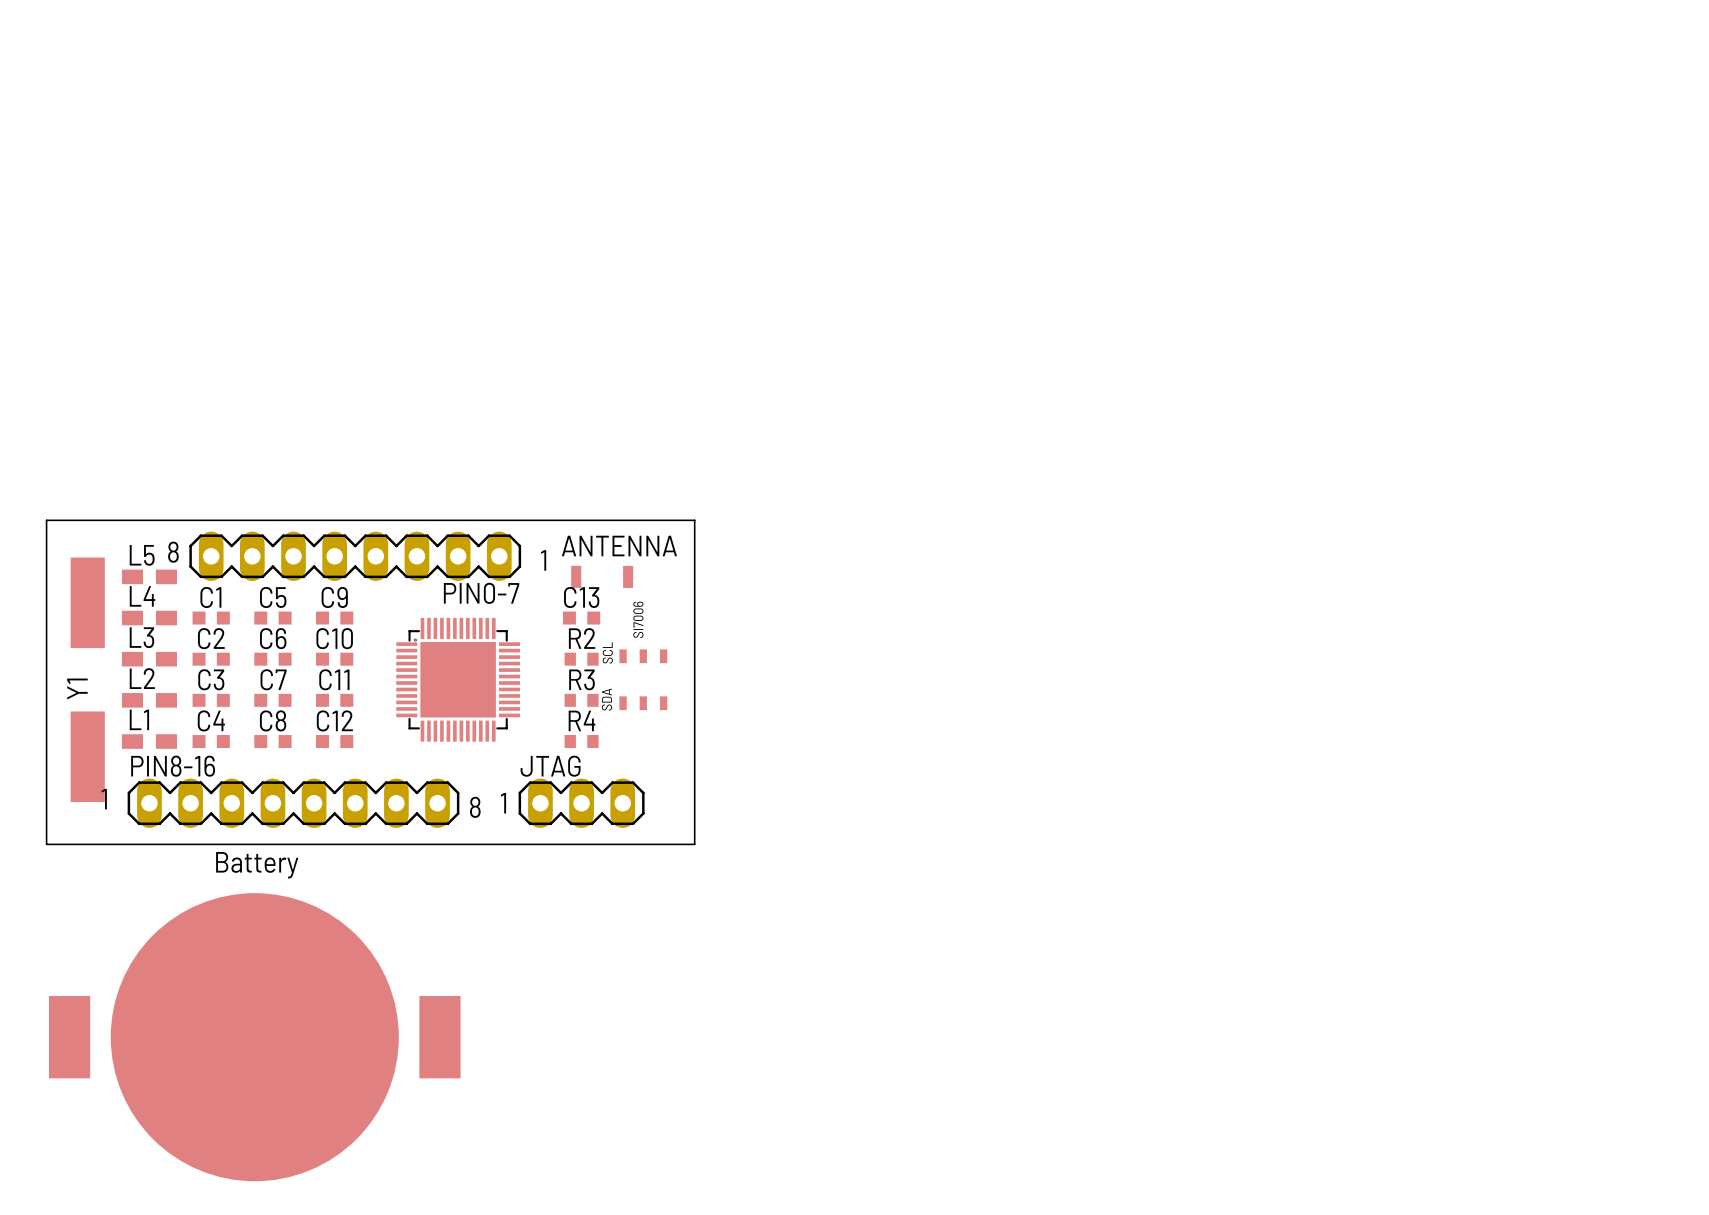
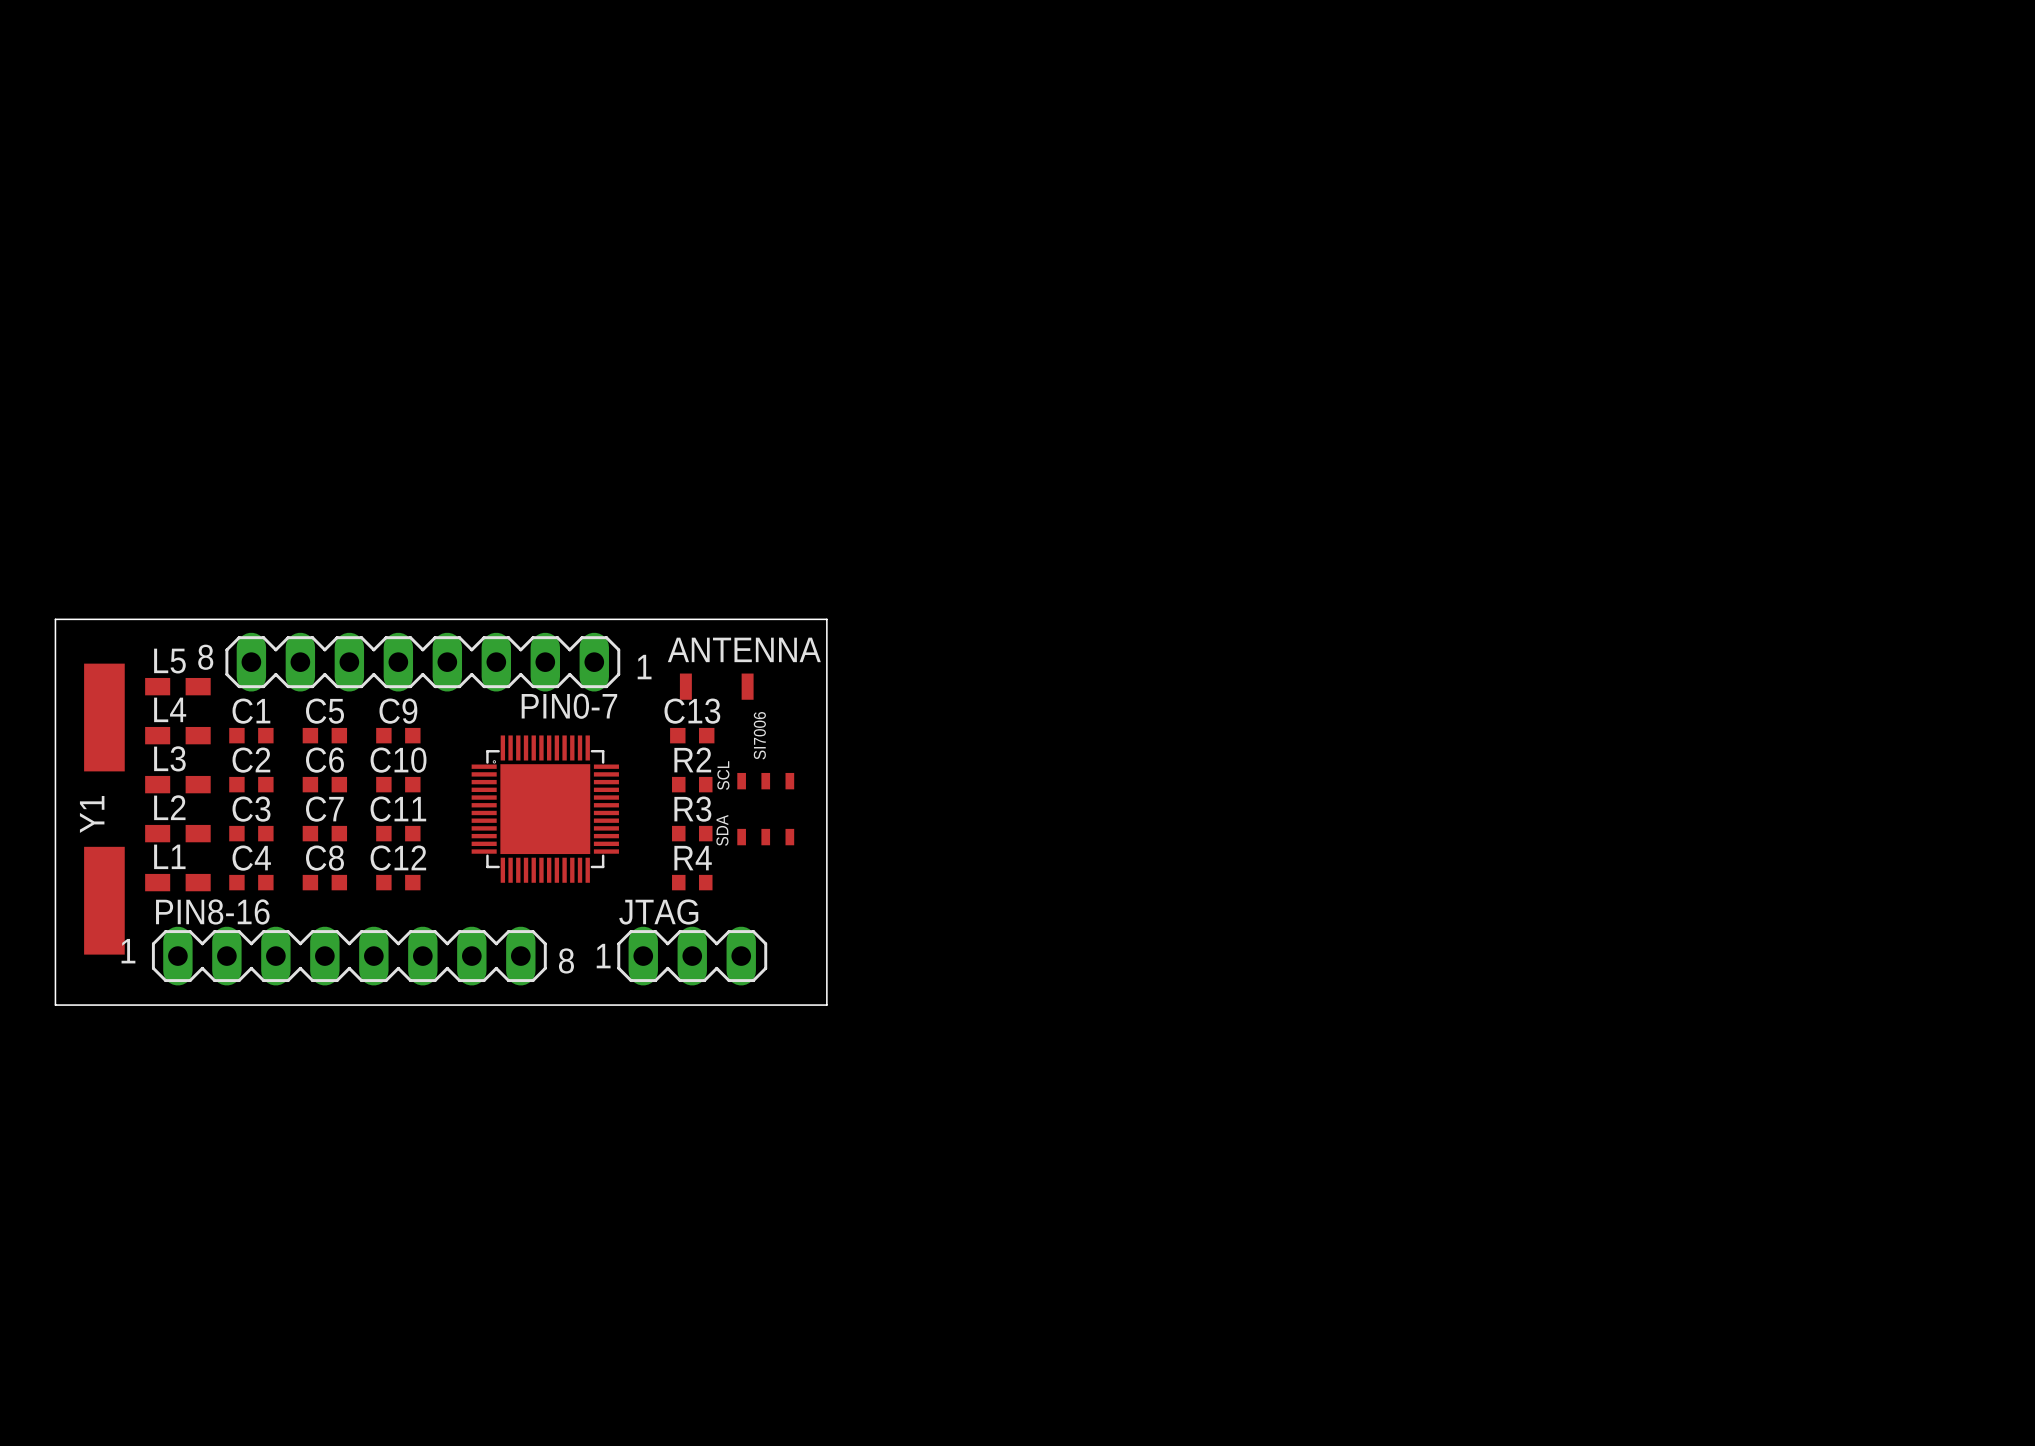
part: (254, 1037) -> none

